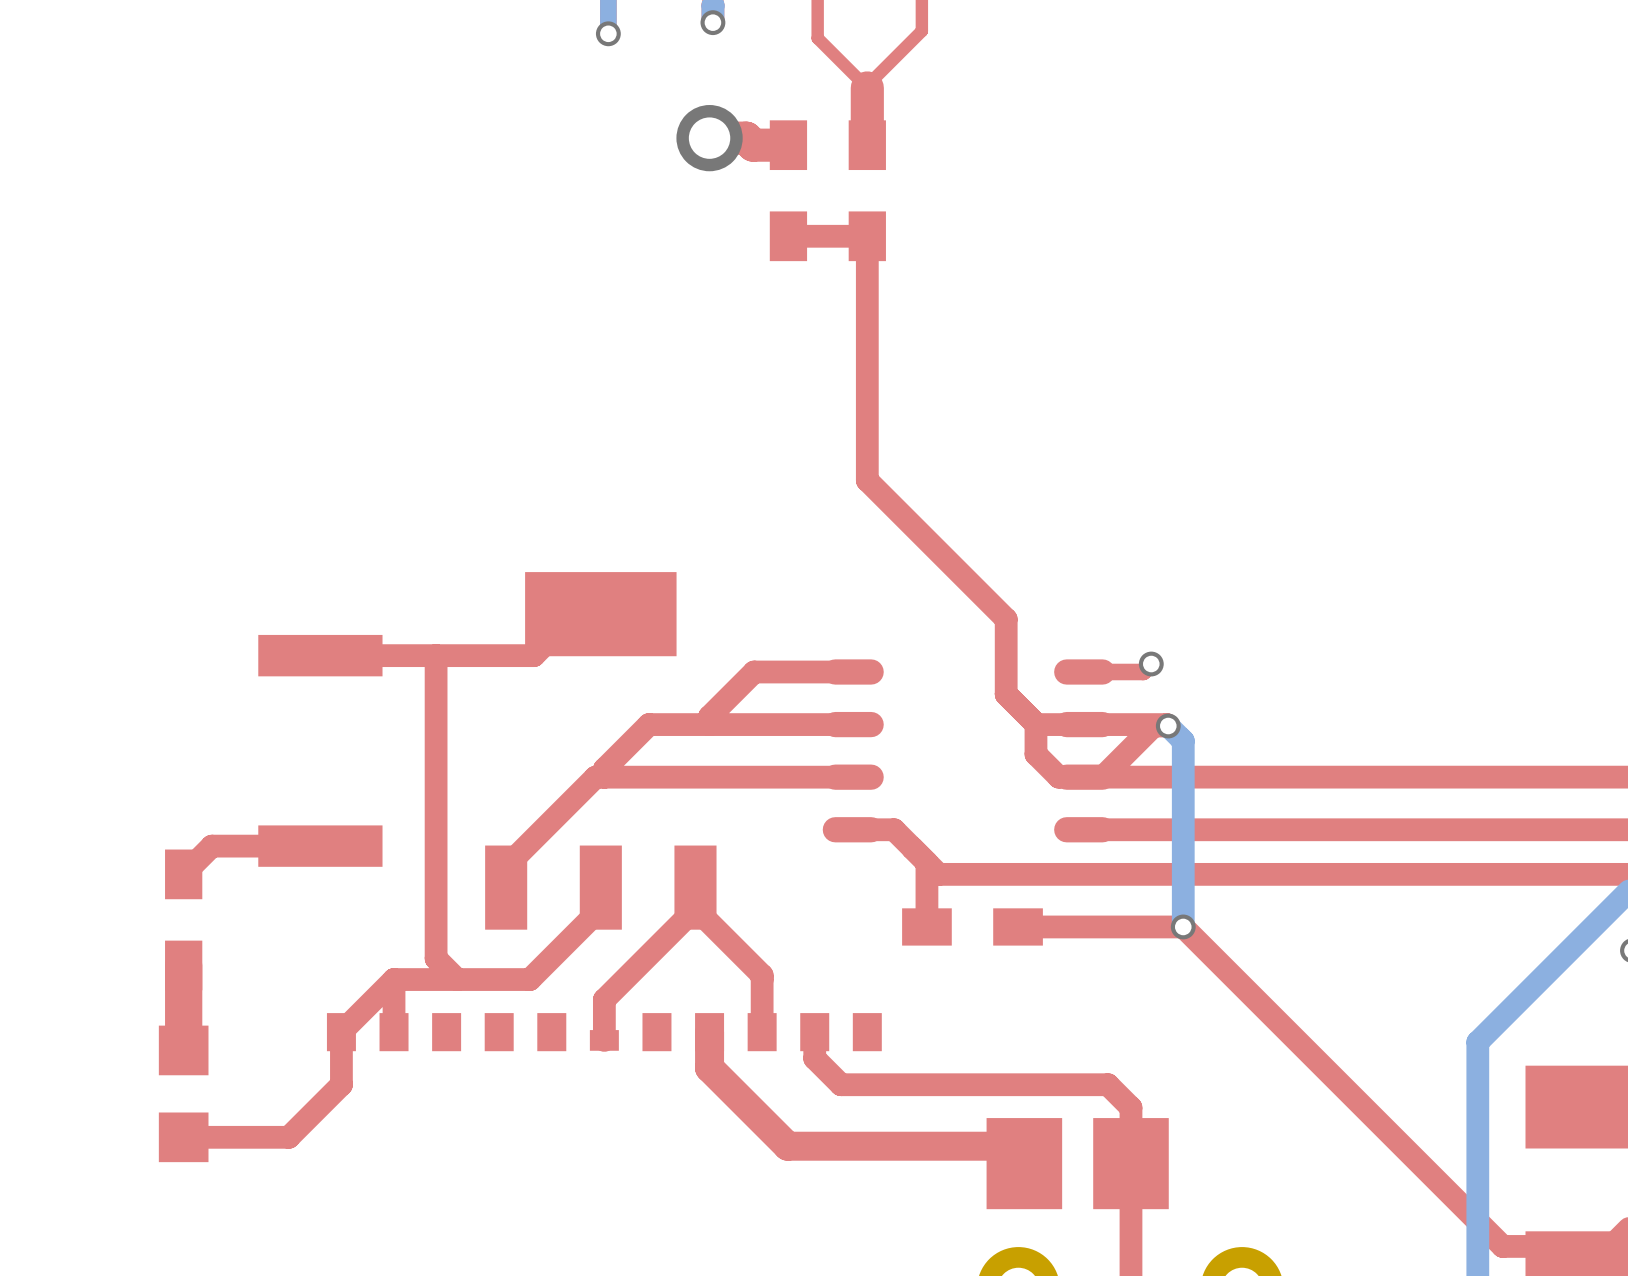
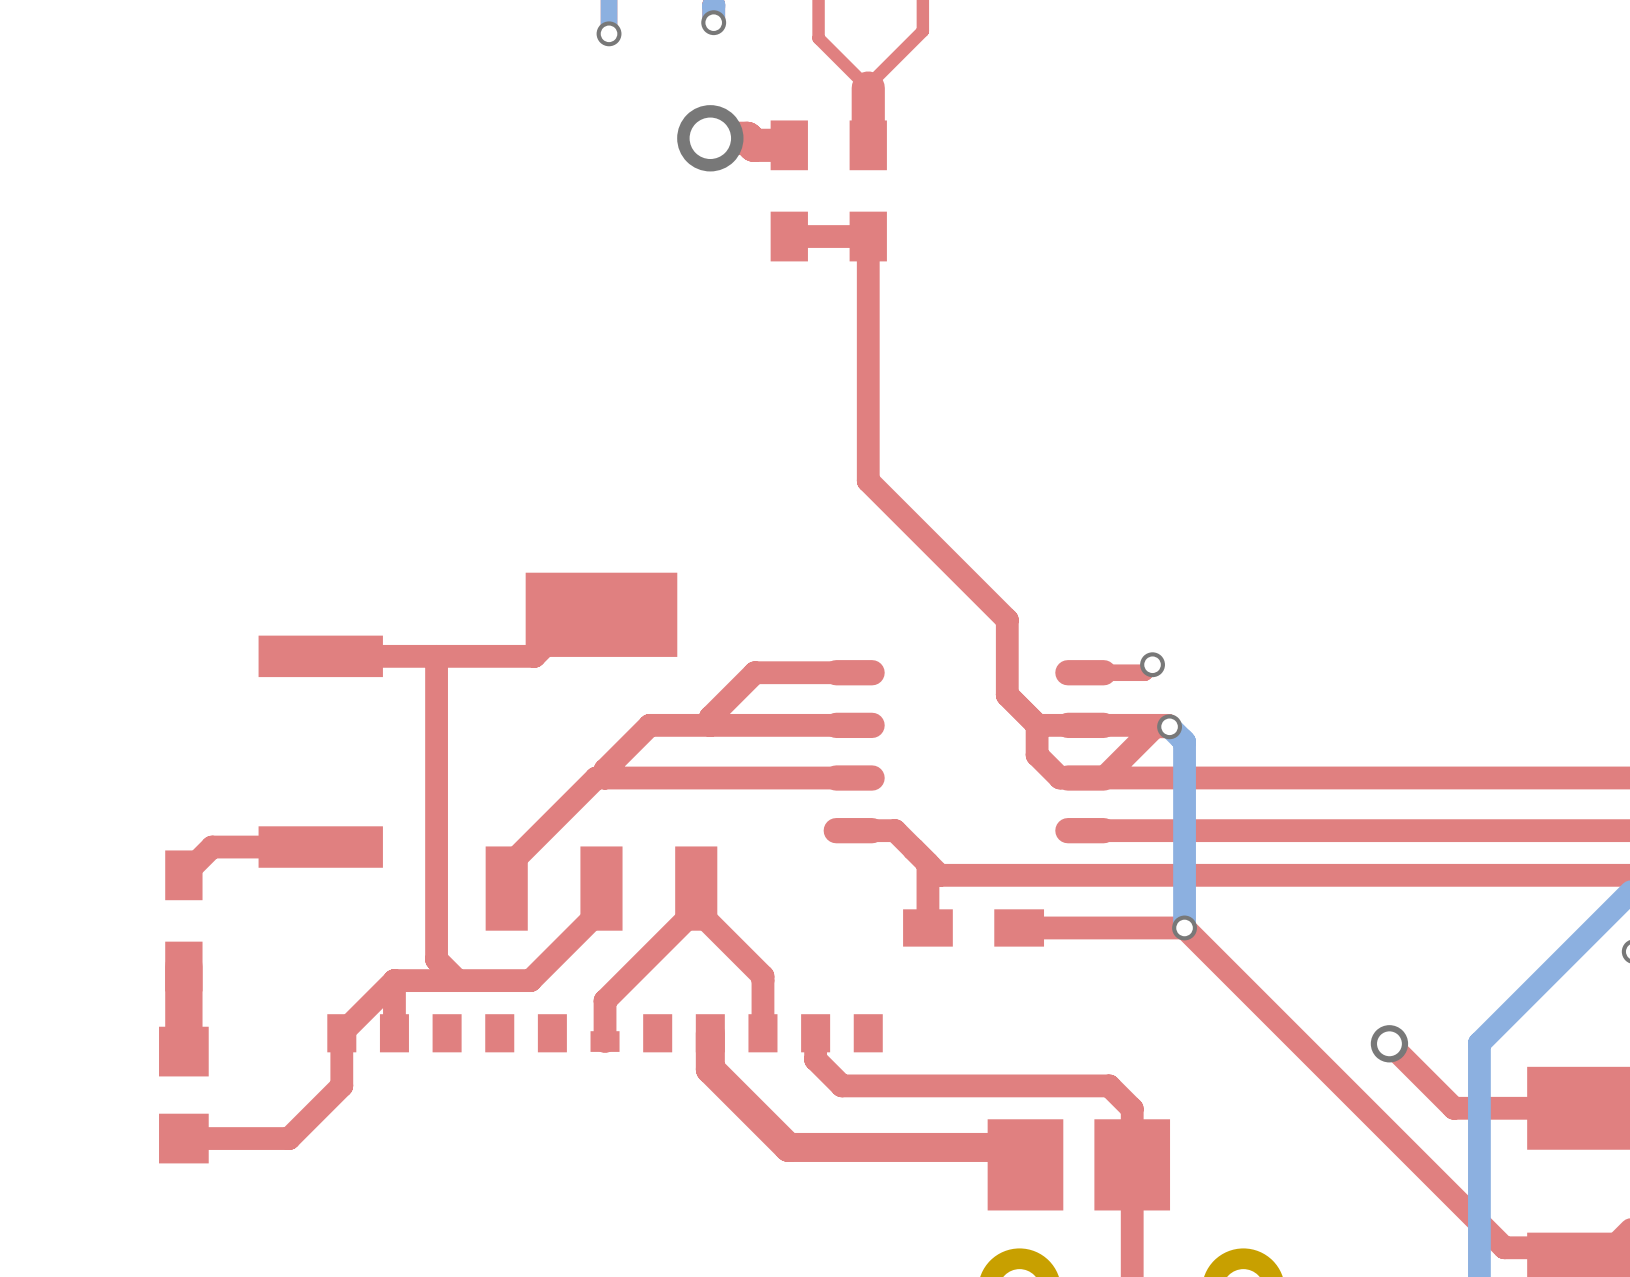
top track: none -> (1389, 1043) (1453, 1108) (1552, 1108)
via: none -> (1389, 1043)

